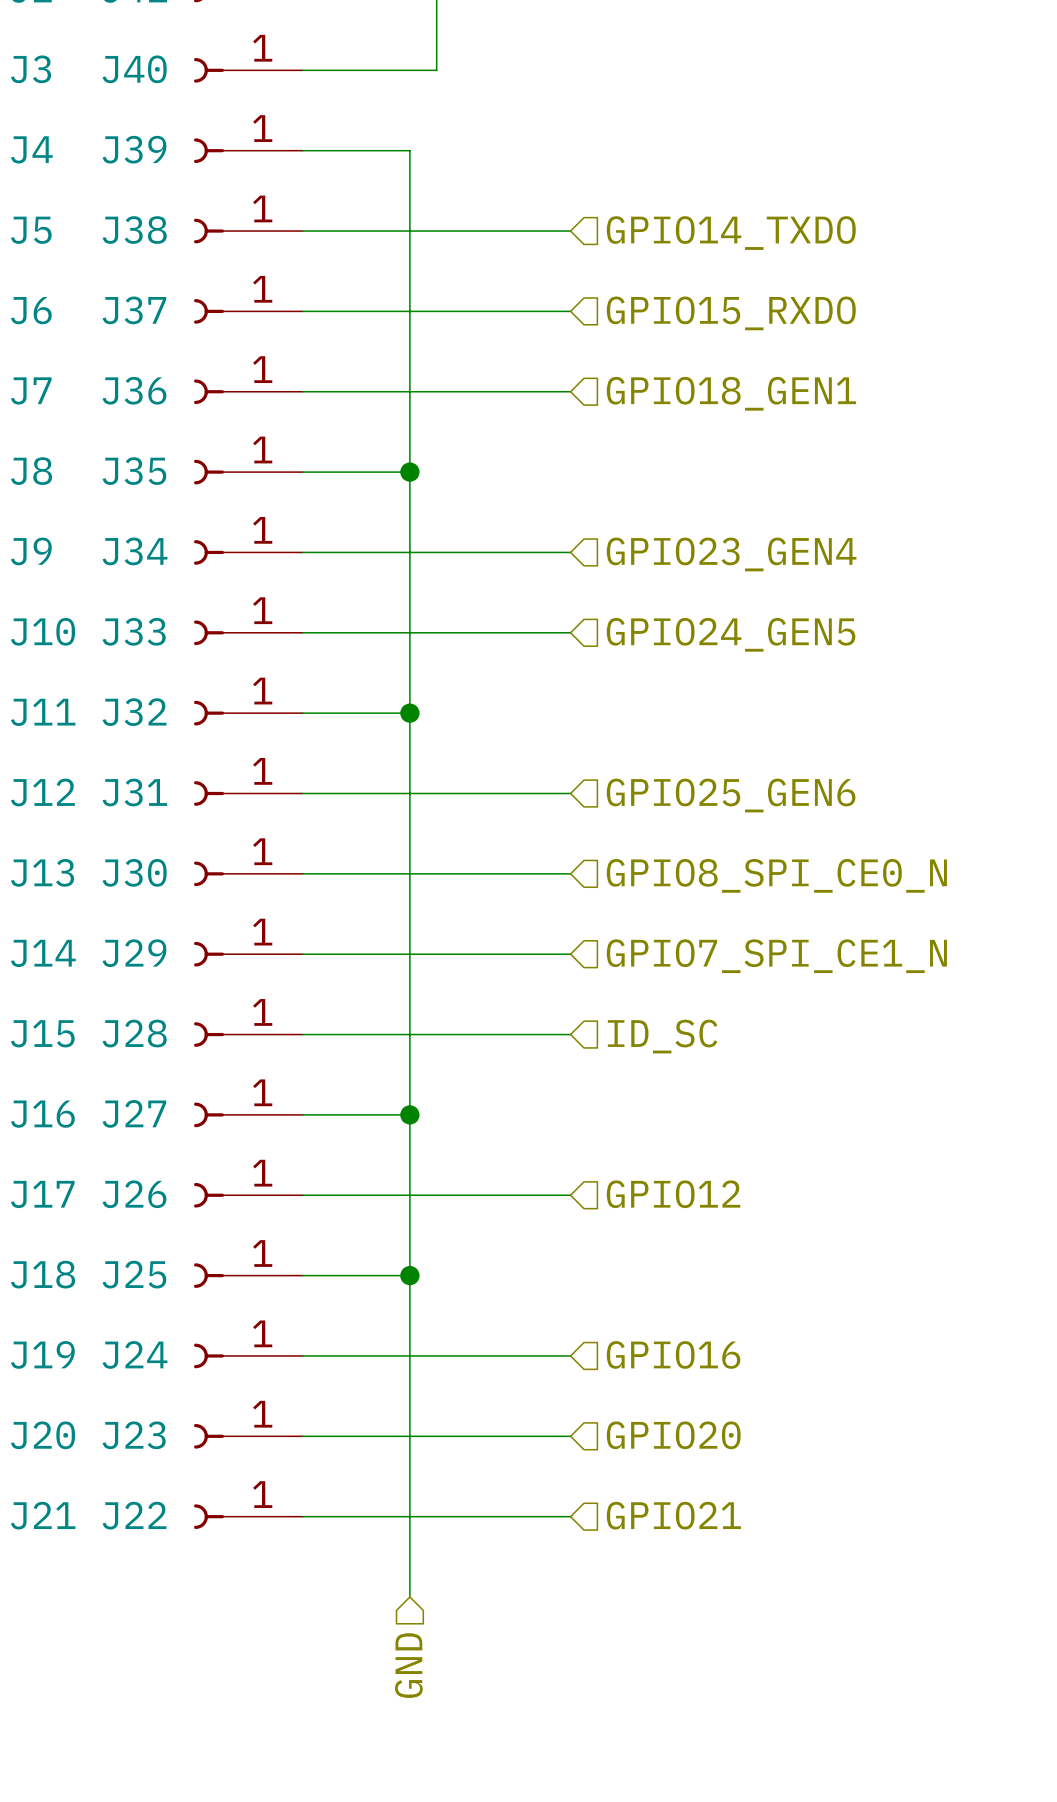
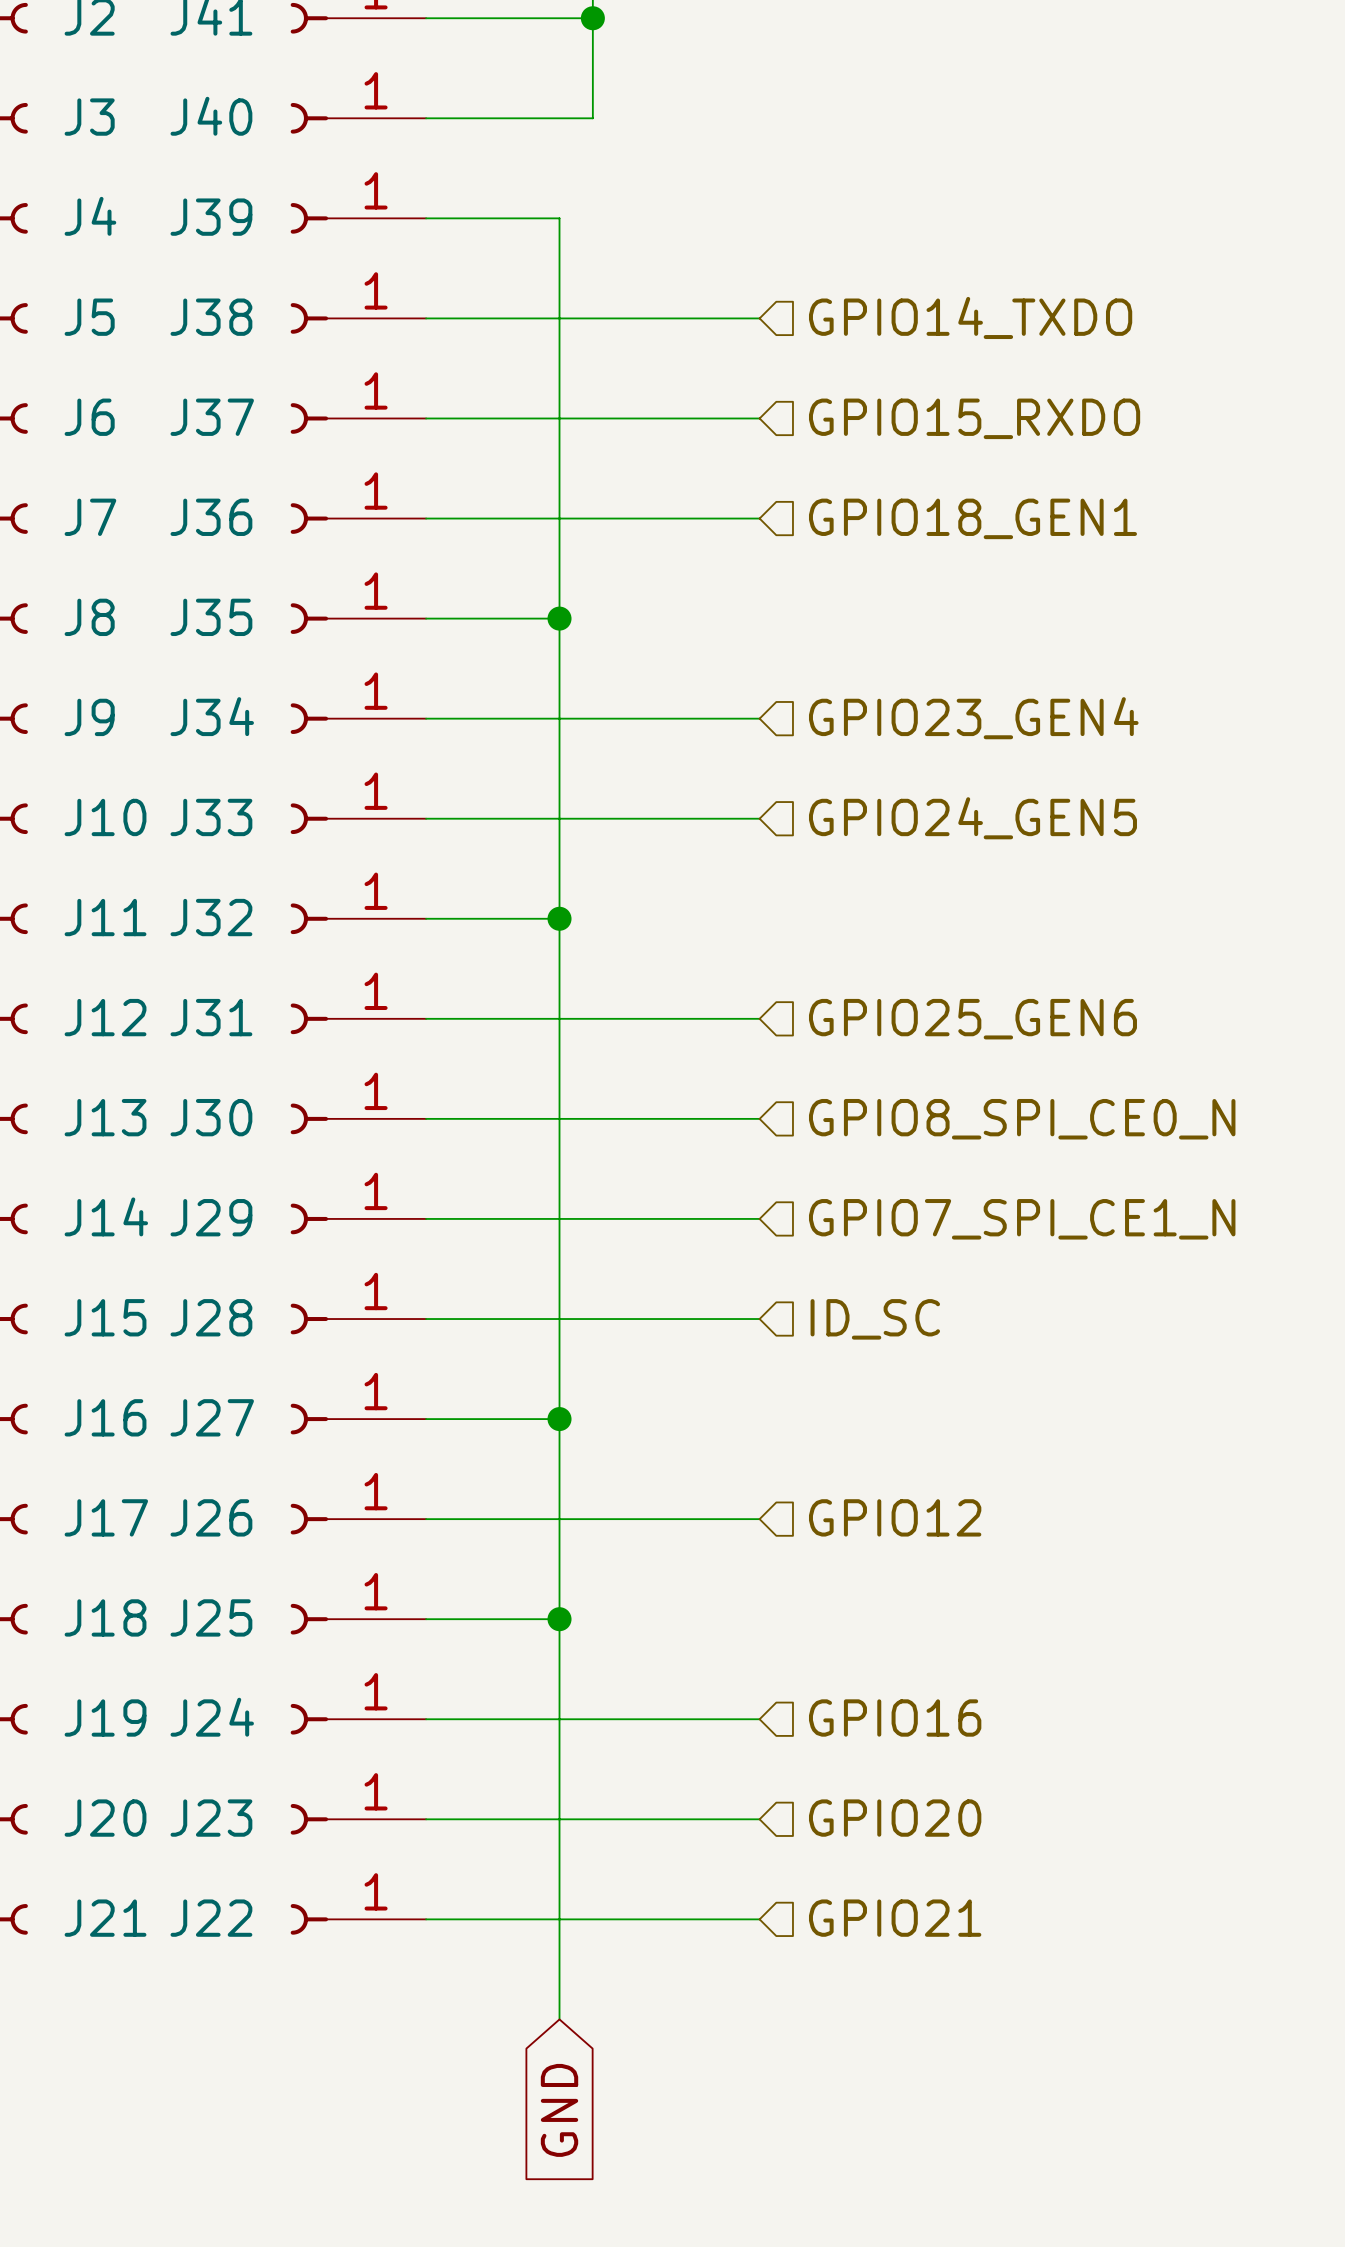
global label: none -> GND (559, 2110)
hierarchical label: GND (408, 1665) -> none

